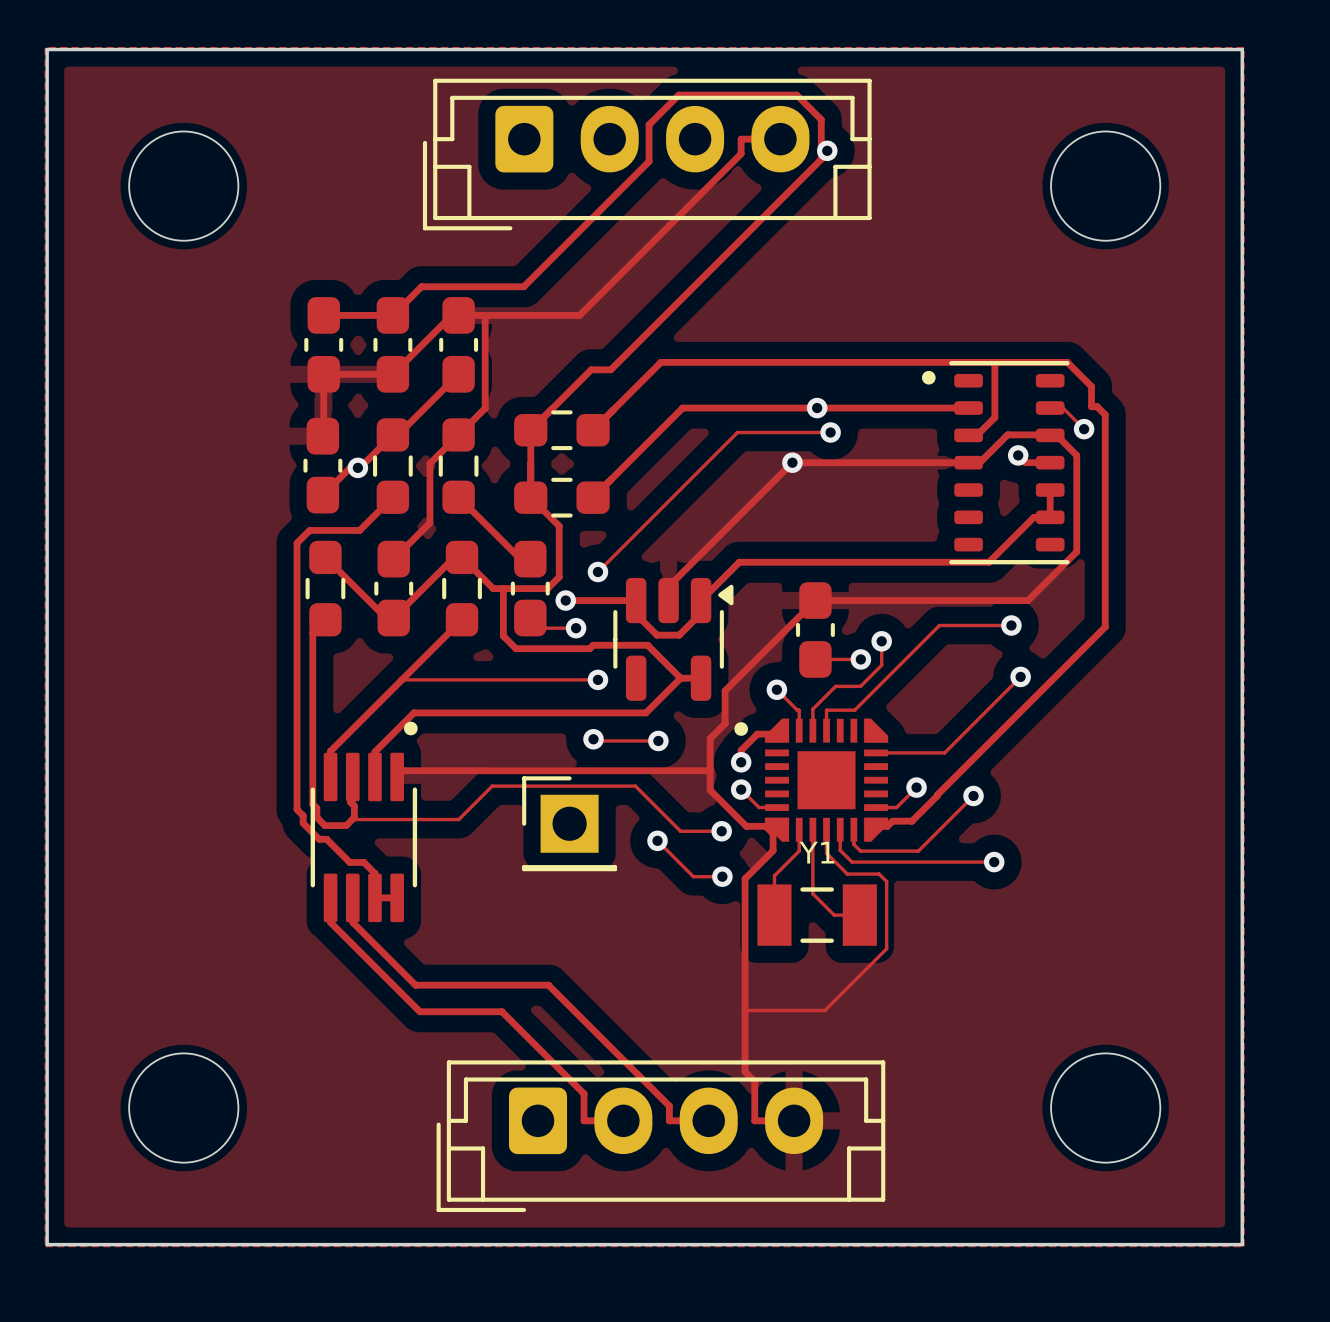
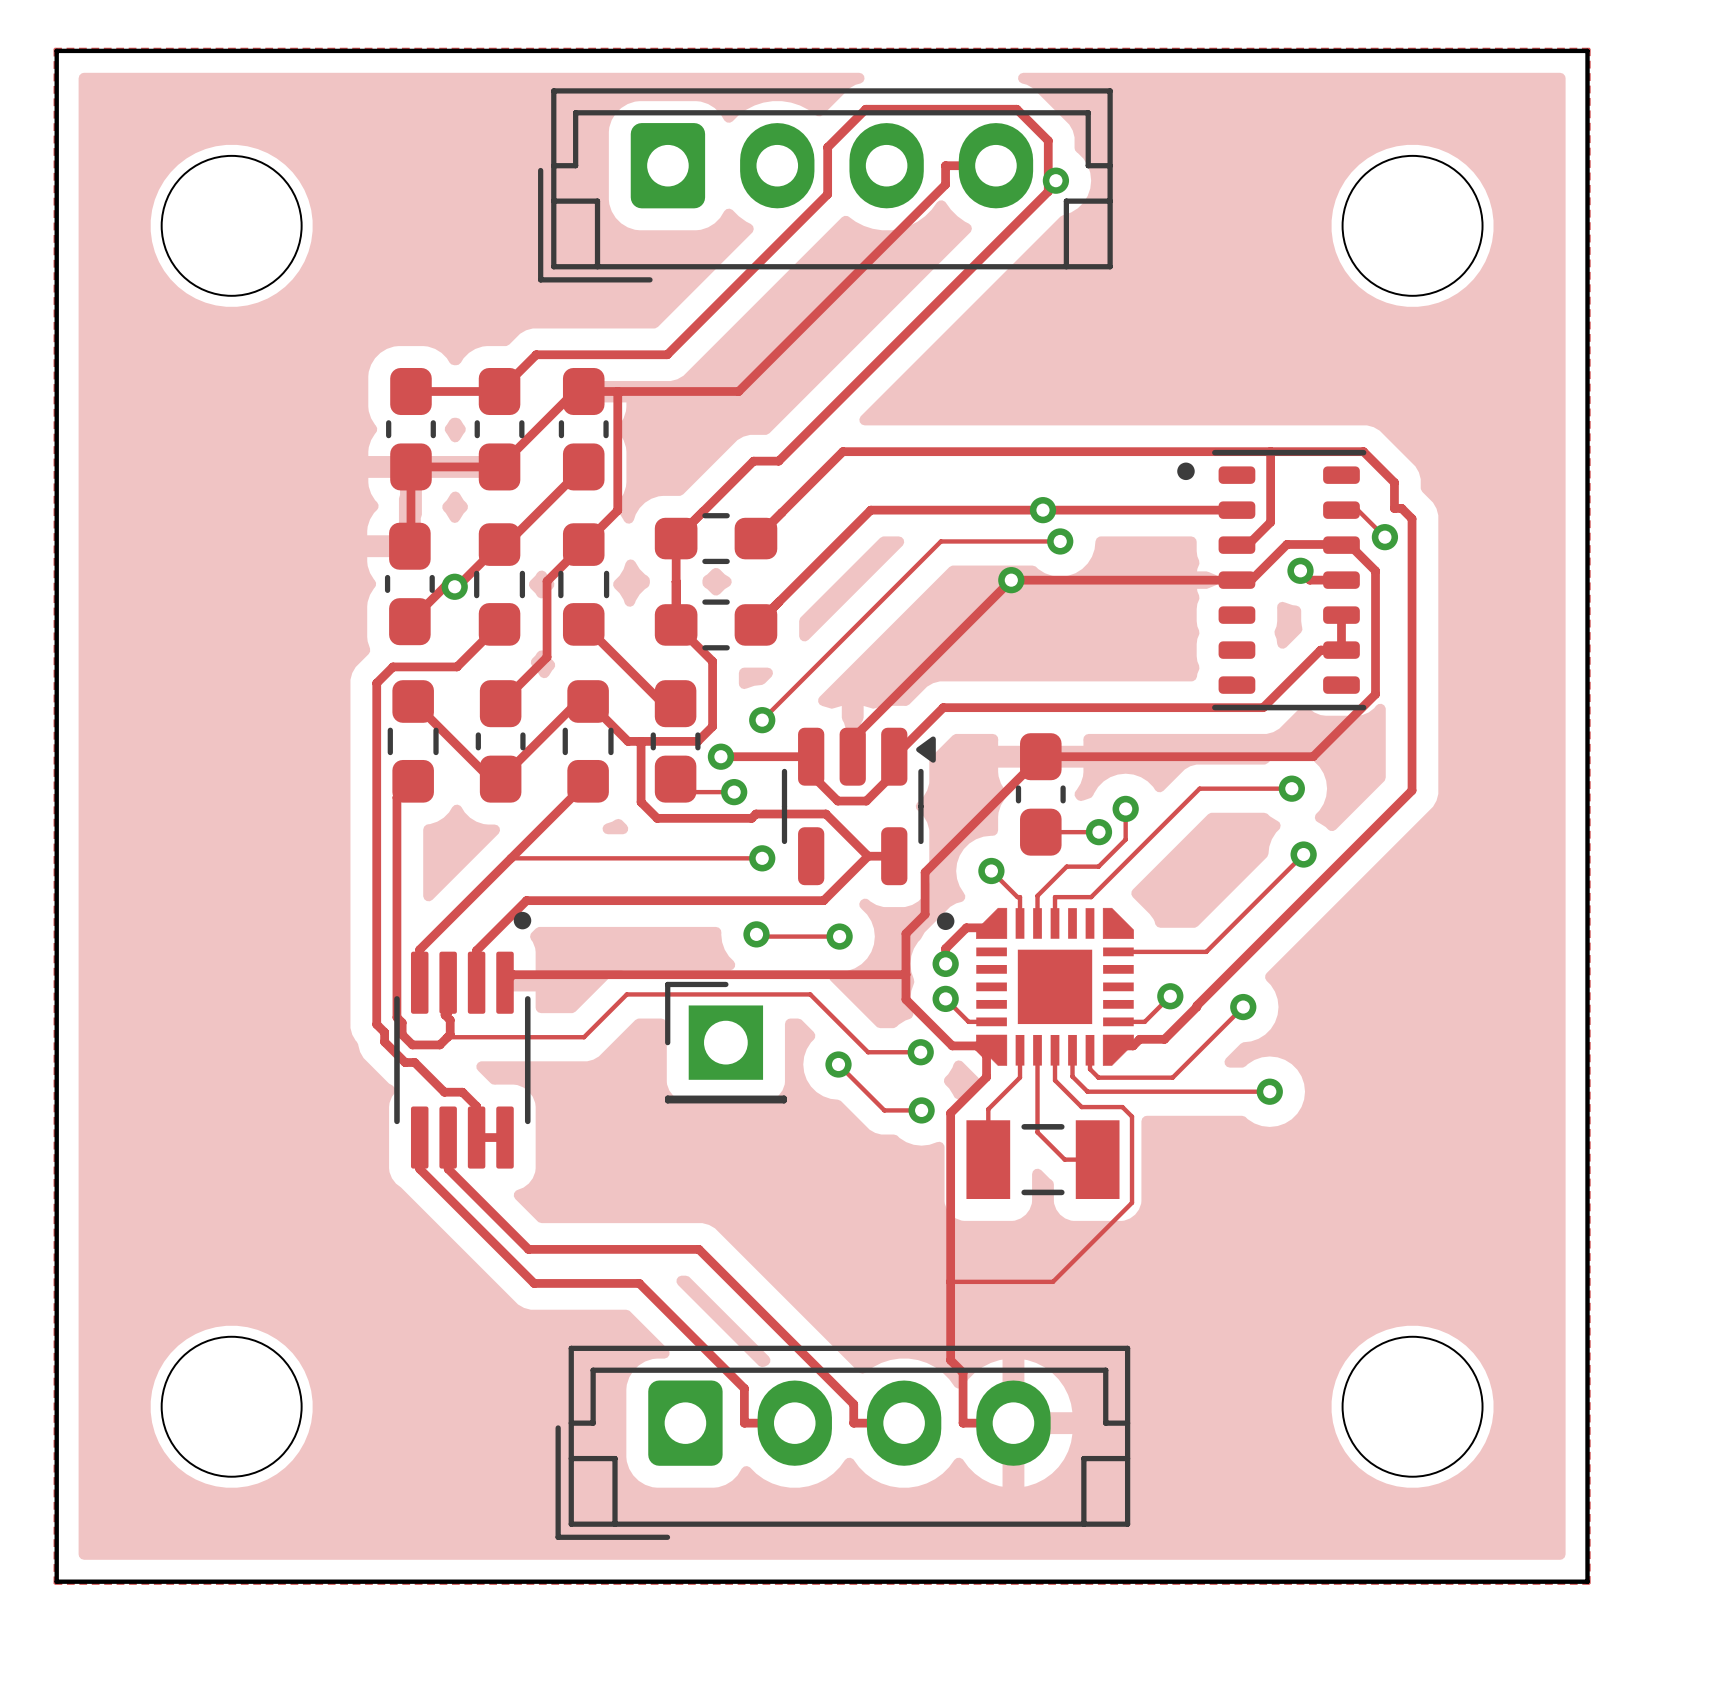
Y1 name: Y1 (816, 852) -> none

